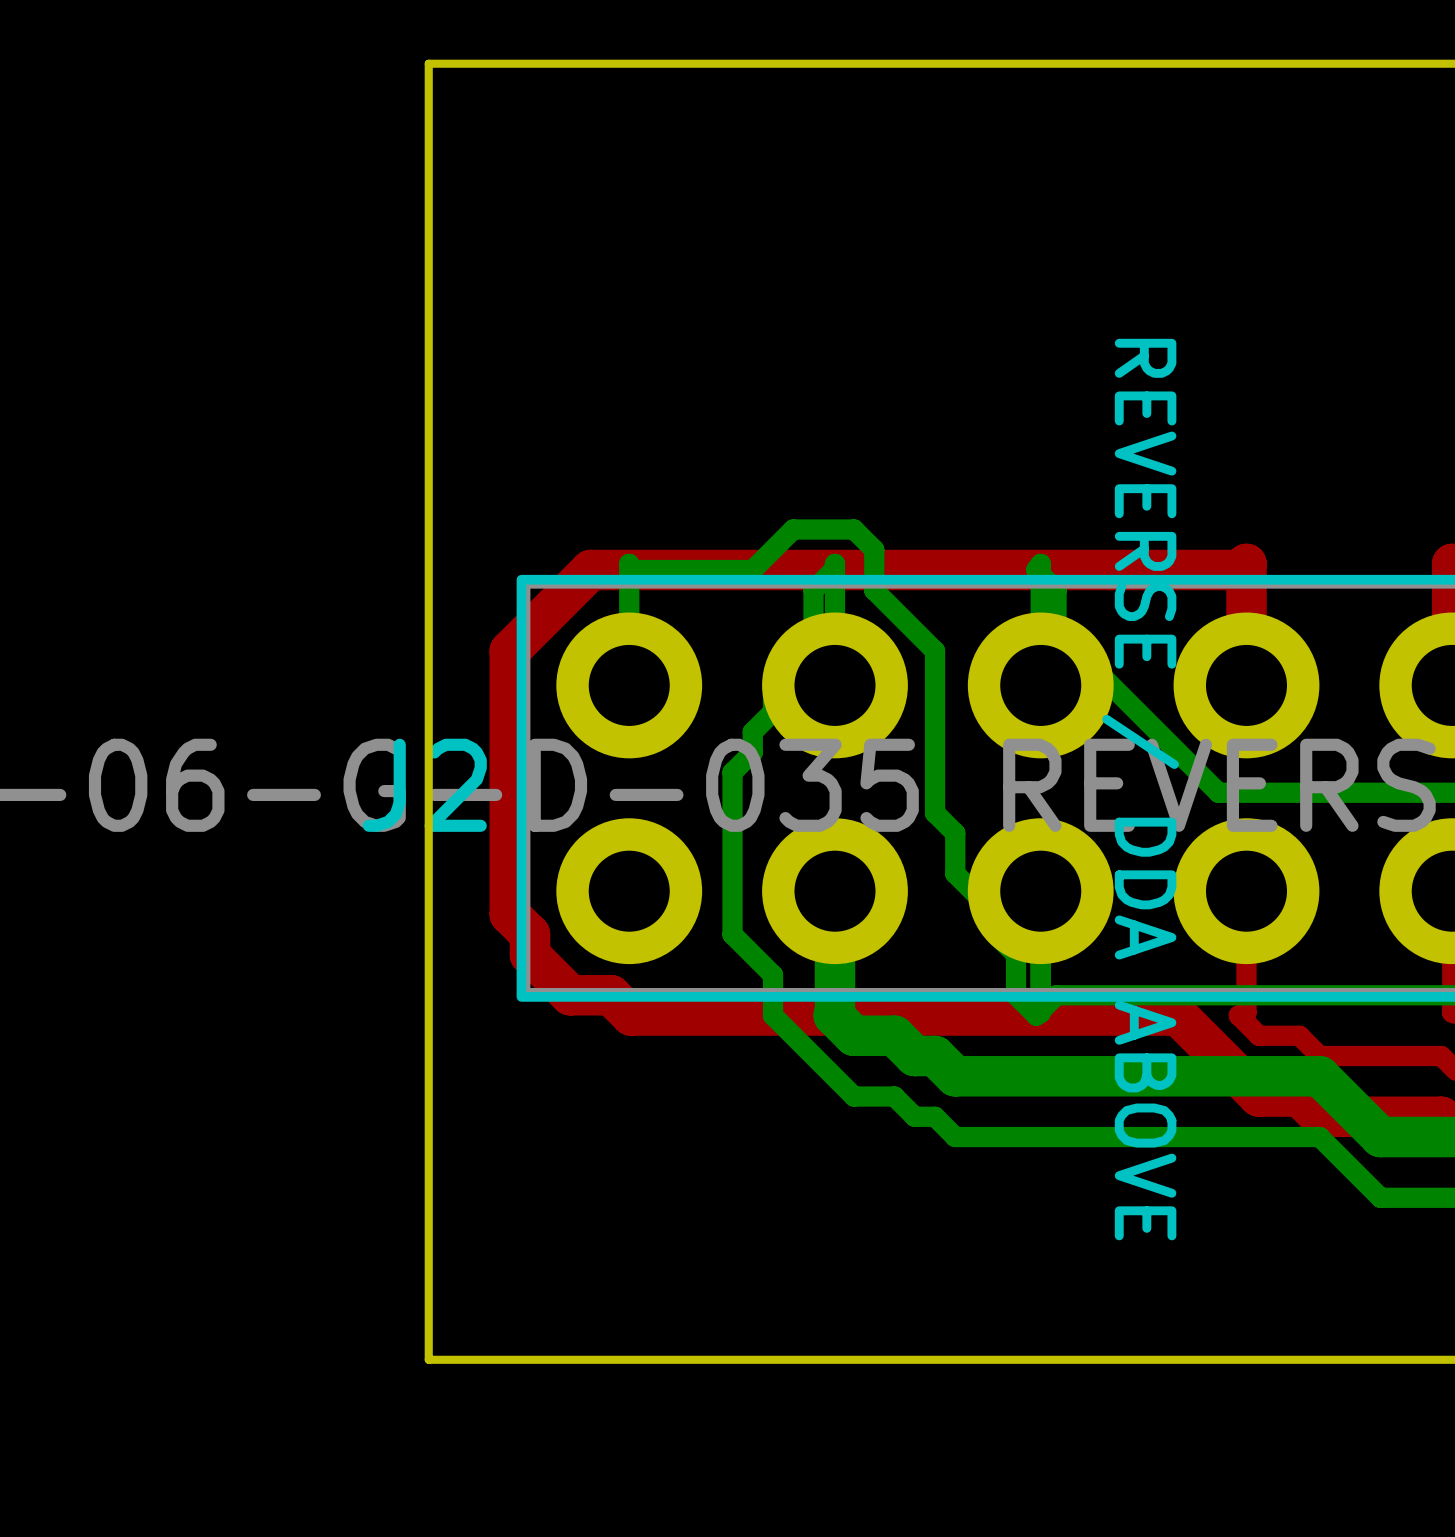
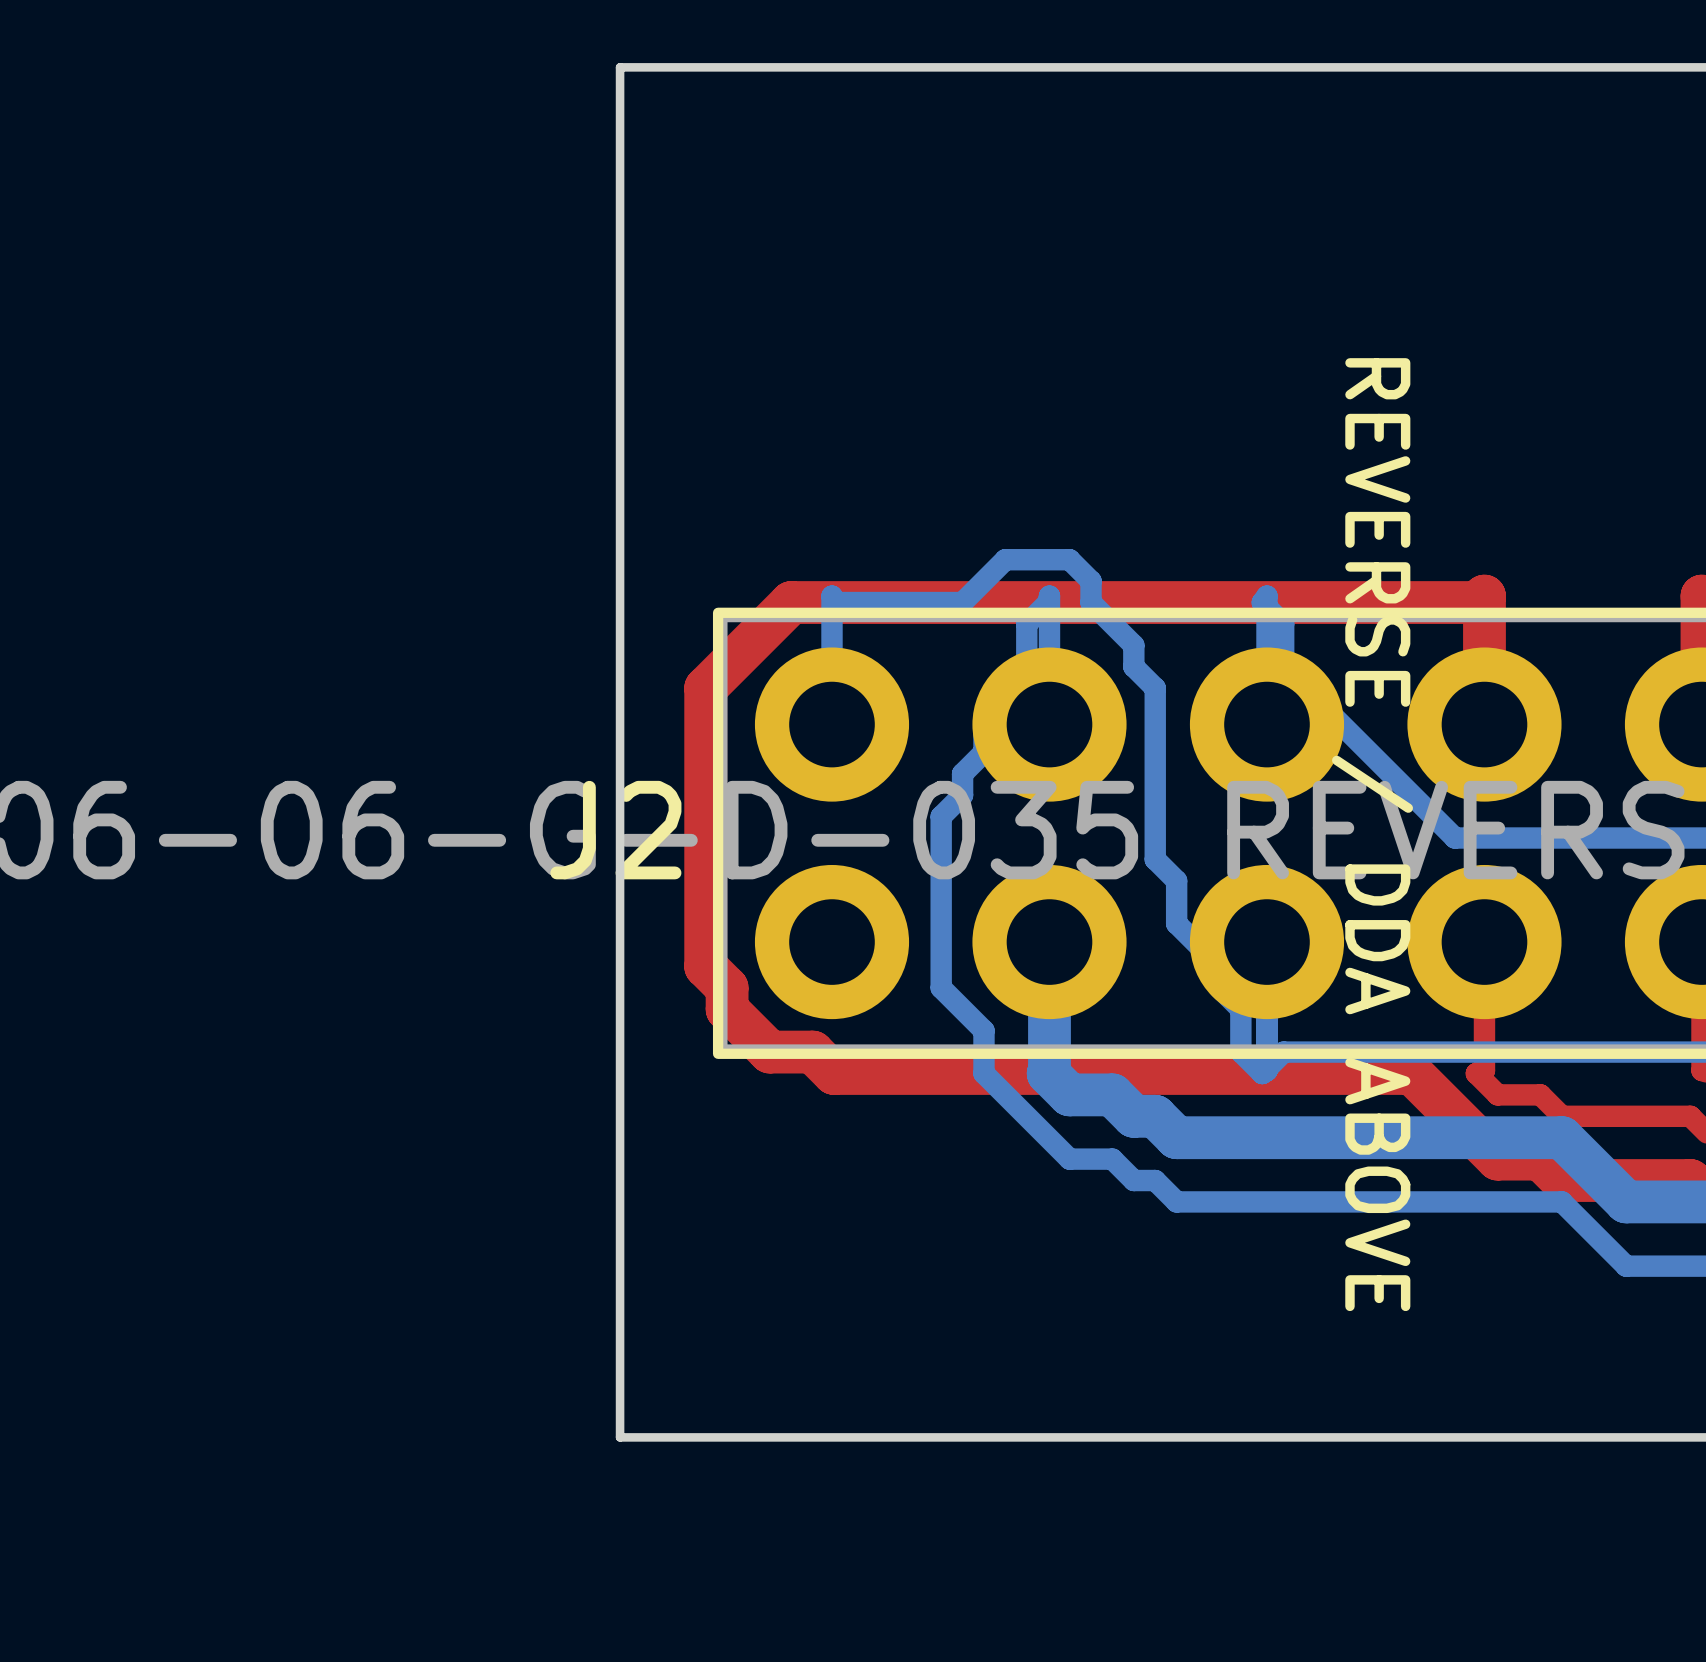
bottom track: (874, 570) (874, 590) (914, 630) -> (1091, 602) (1133, 645) (1133, 666)

